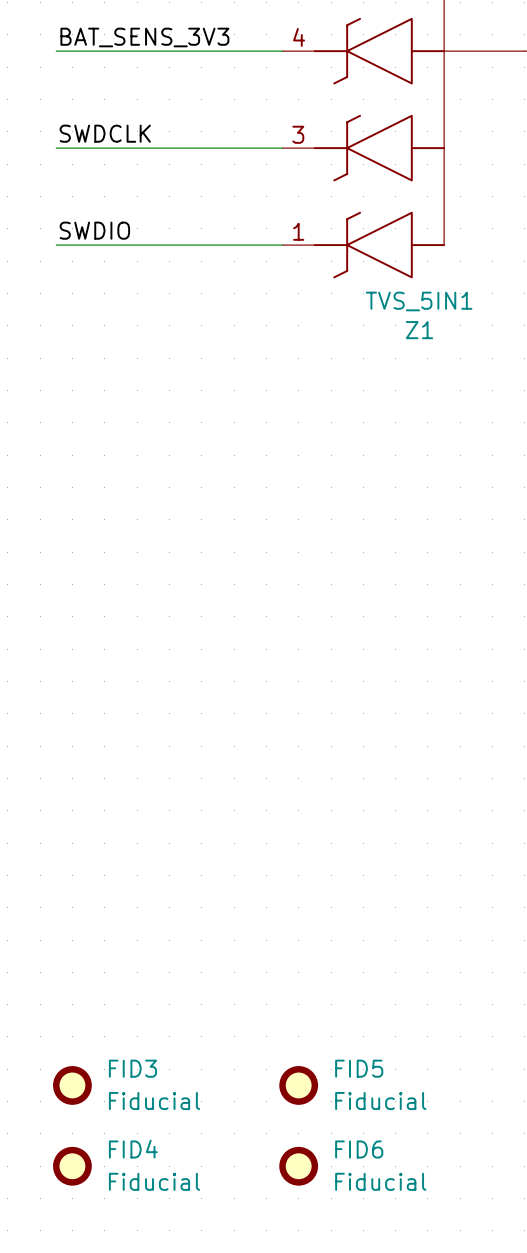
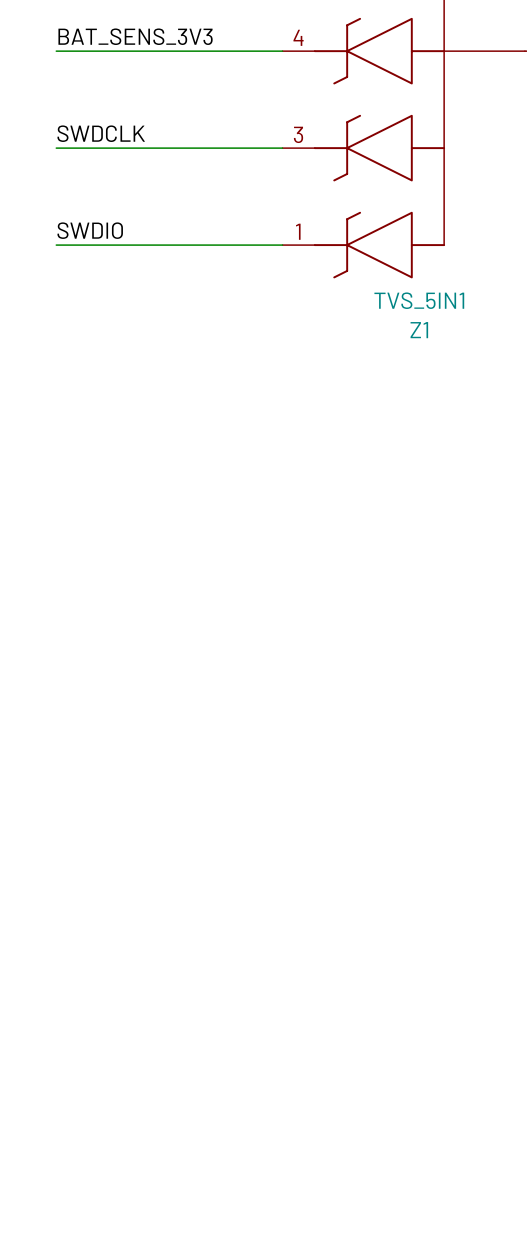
FID3: Fiducial (72, 1085) -> none
FID5: Fiducial (298, 1085) -> none
FID4: Fiducial (72, 1166) -> none
FID6: Fiducial (298, 1166) -> none

